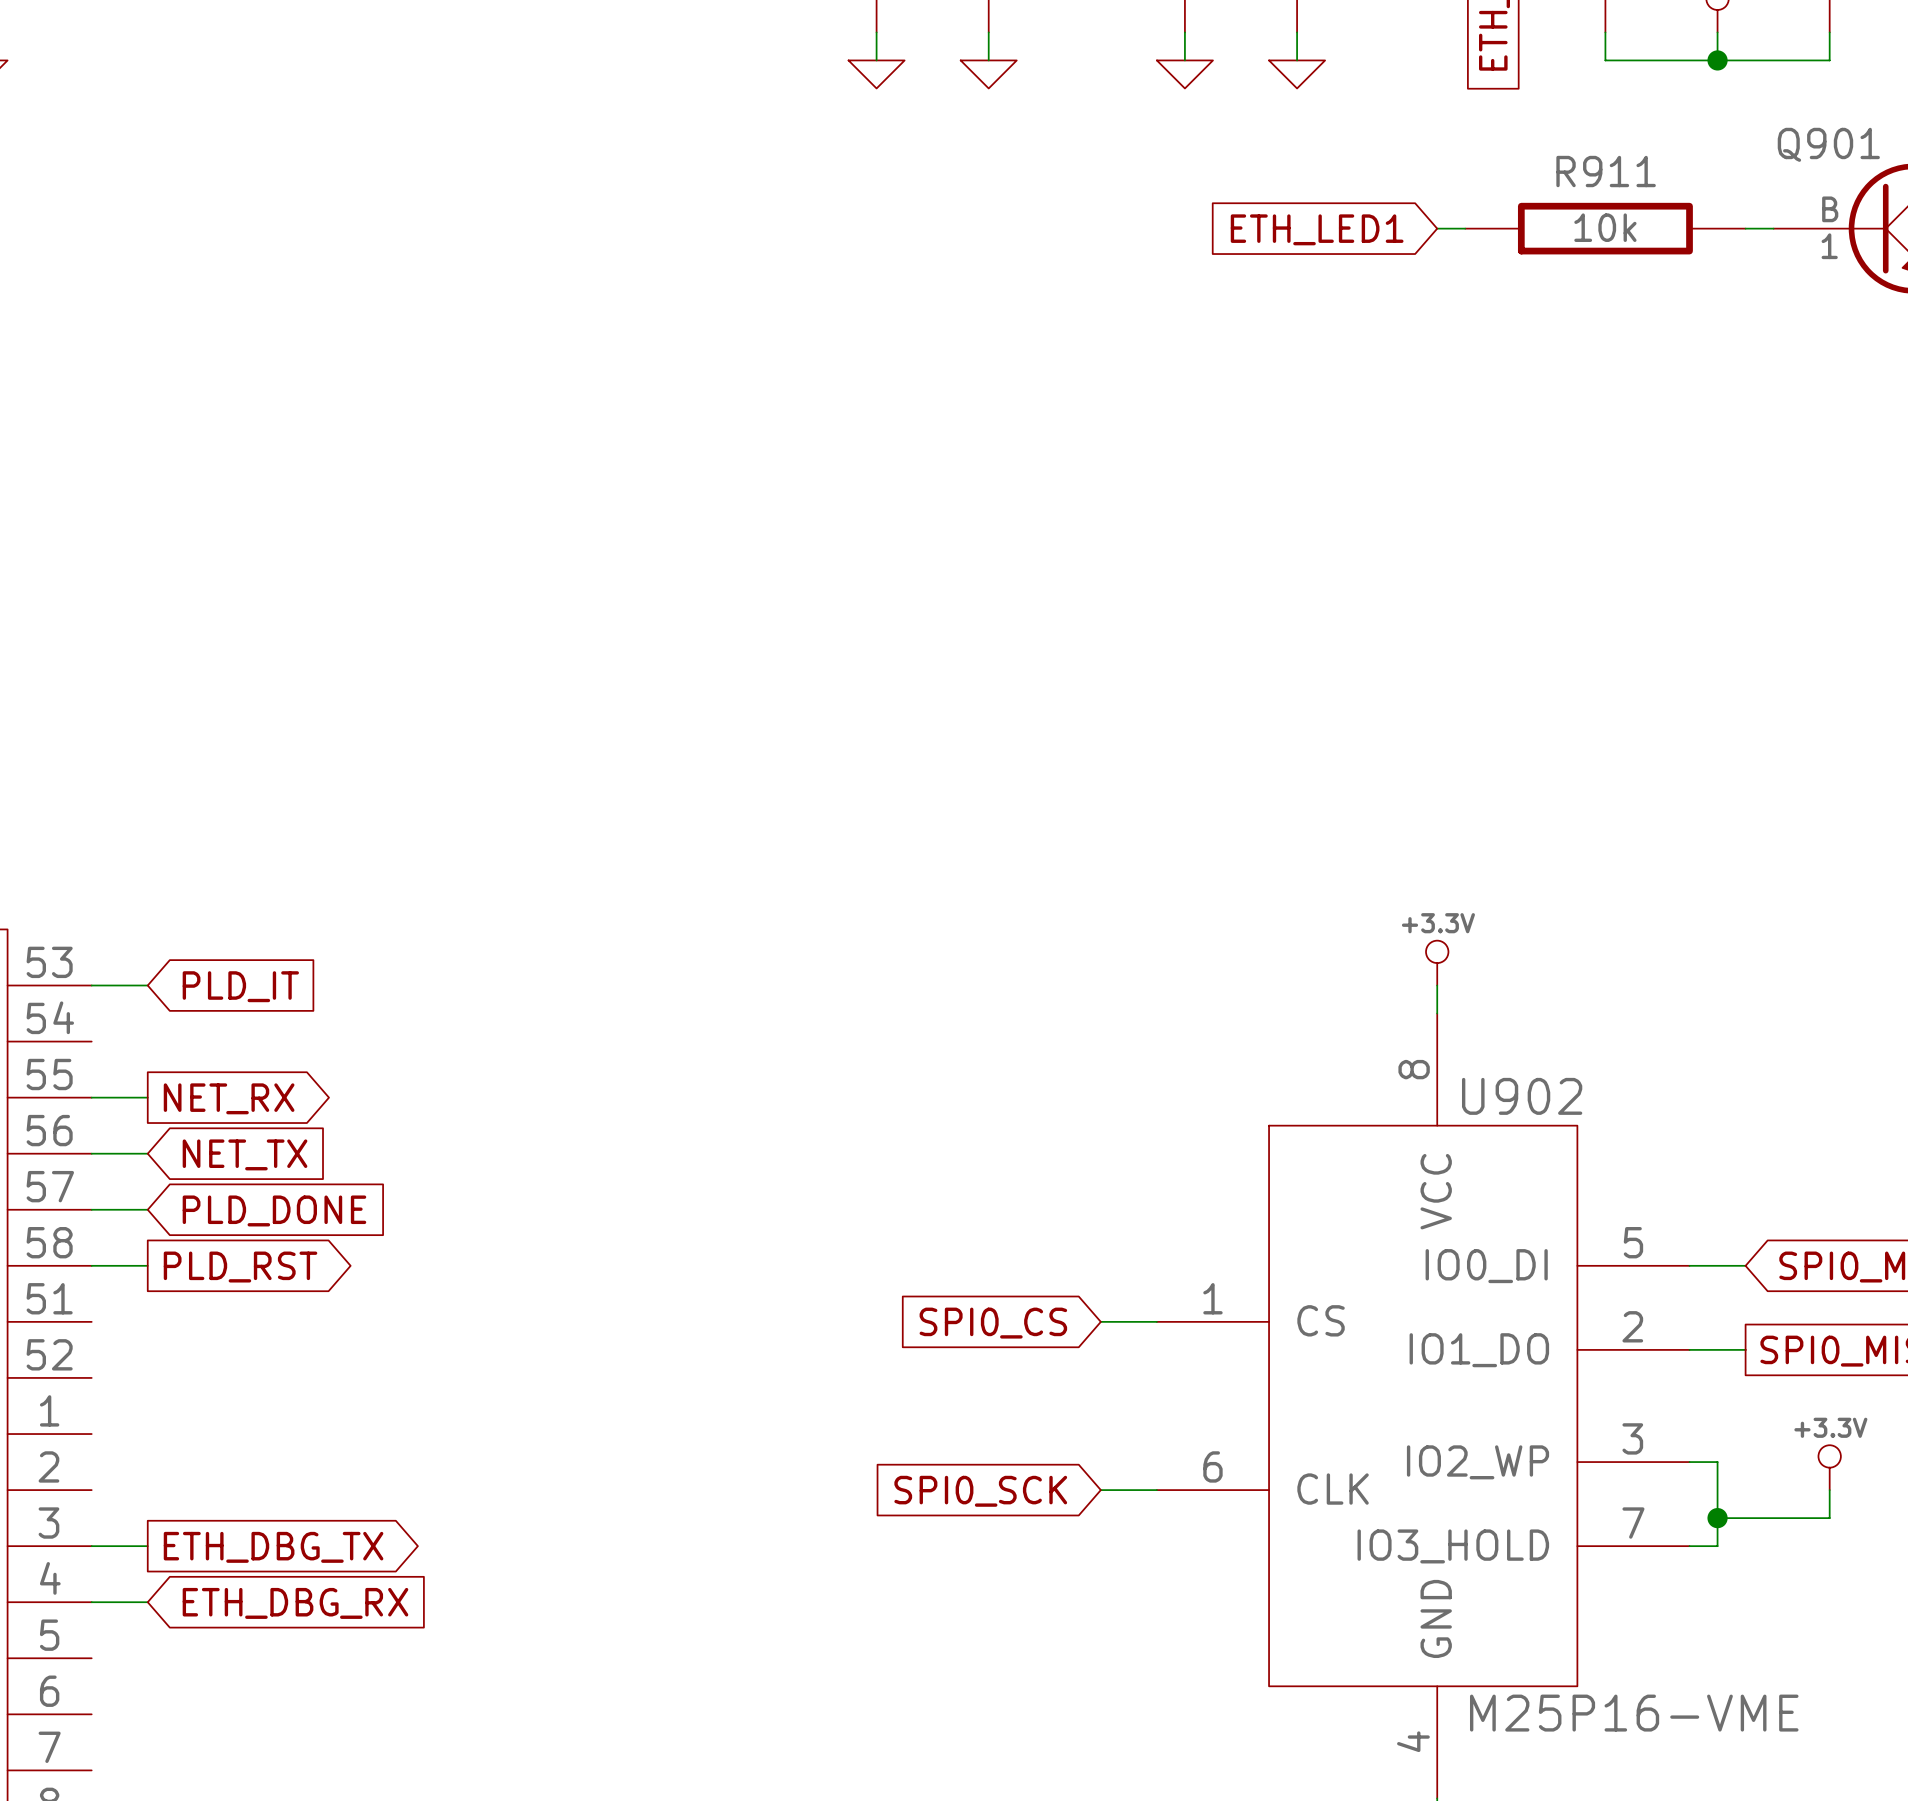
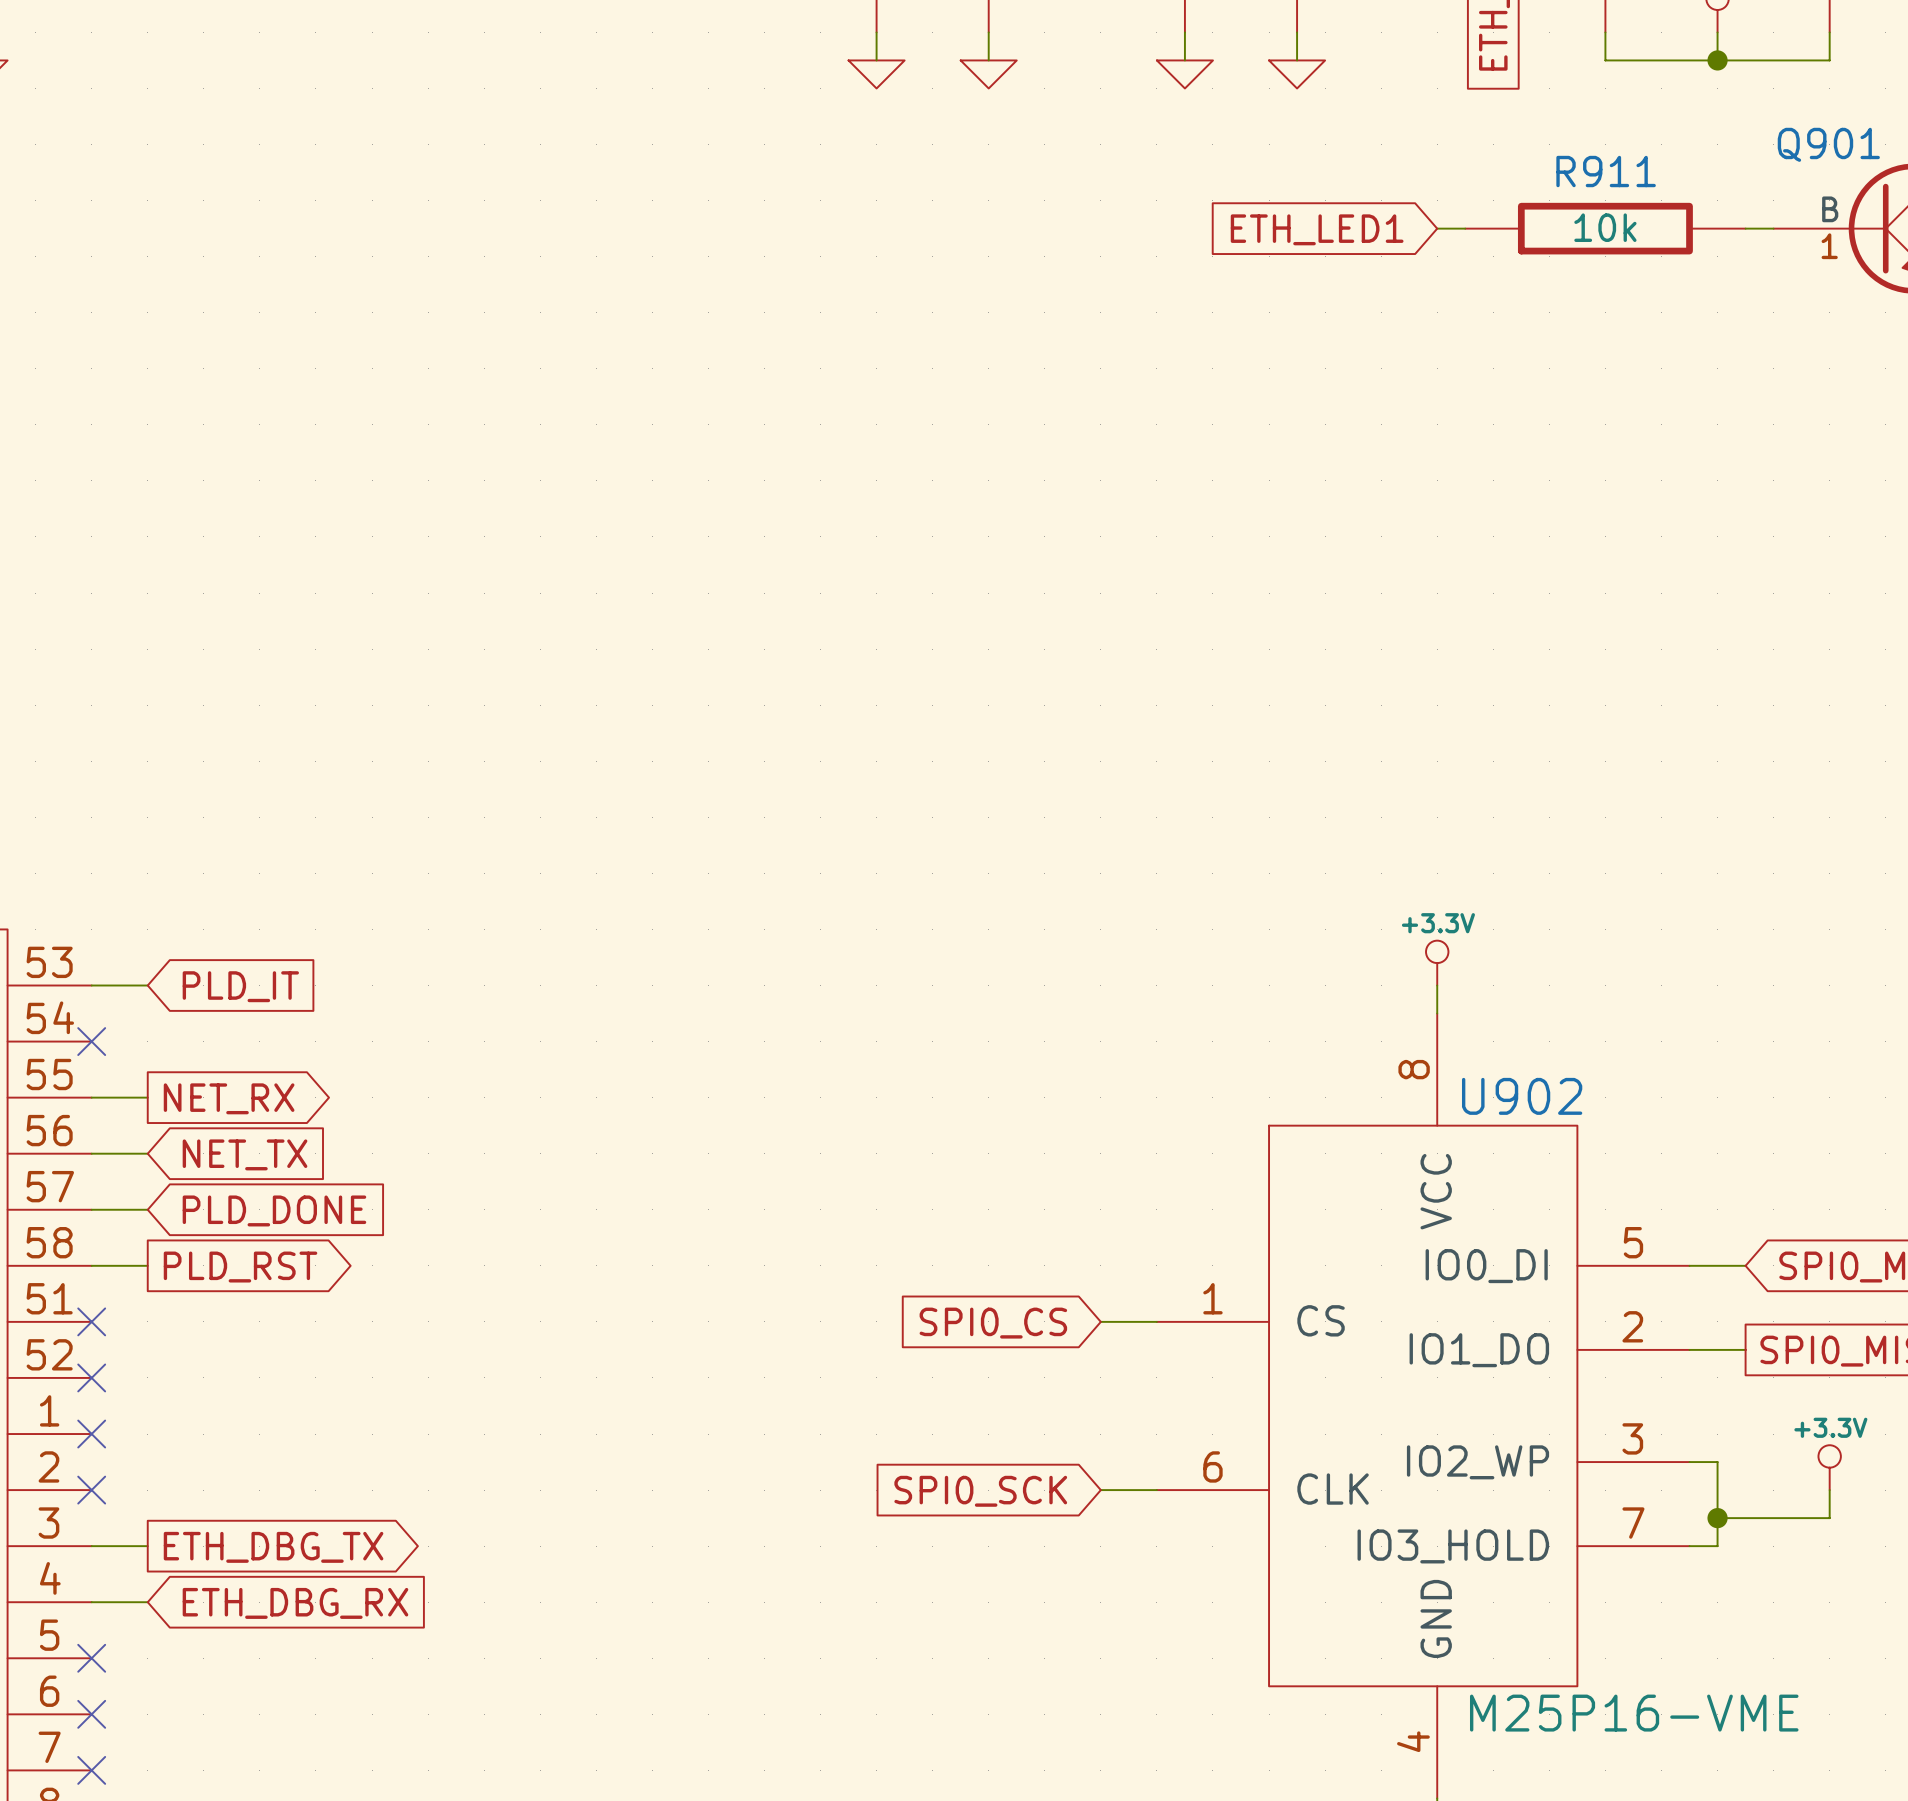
no-connect mark: none -> (91, 1041)
no-connect mark: none -> (91, 1321)
no-connect mark: none -> (91, 1377)
no-connect mark: none -> (91, 1434)
no-connect mark: none -> (91, 1490)
no-connect mark: none -> (91, 1658)
no-connect mark: none -> (91, 1714)
no-connect mark: none -> (91, 1770)

